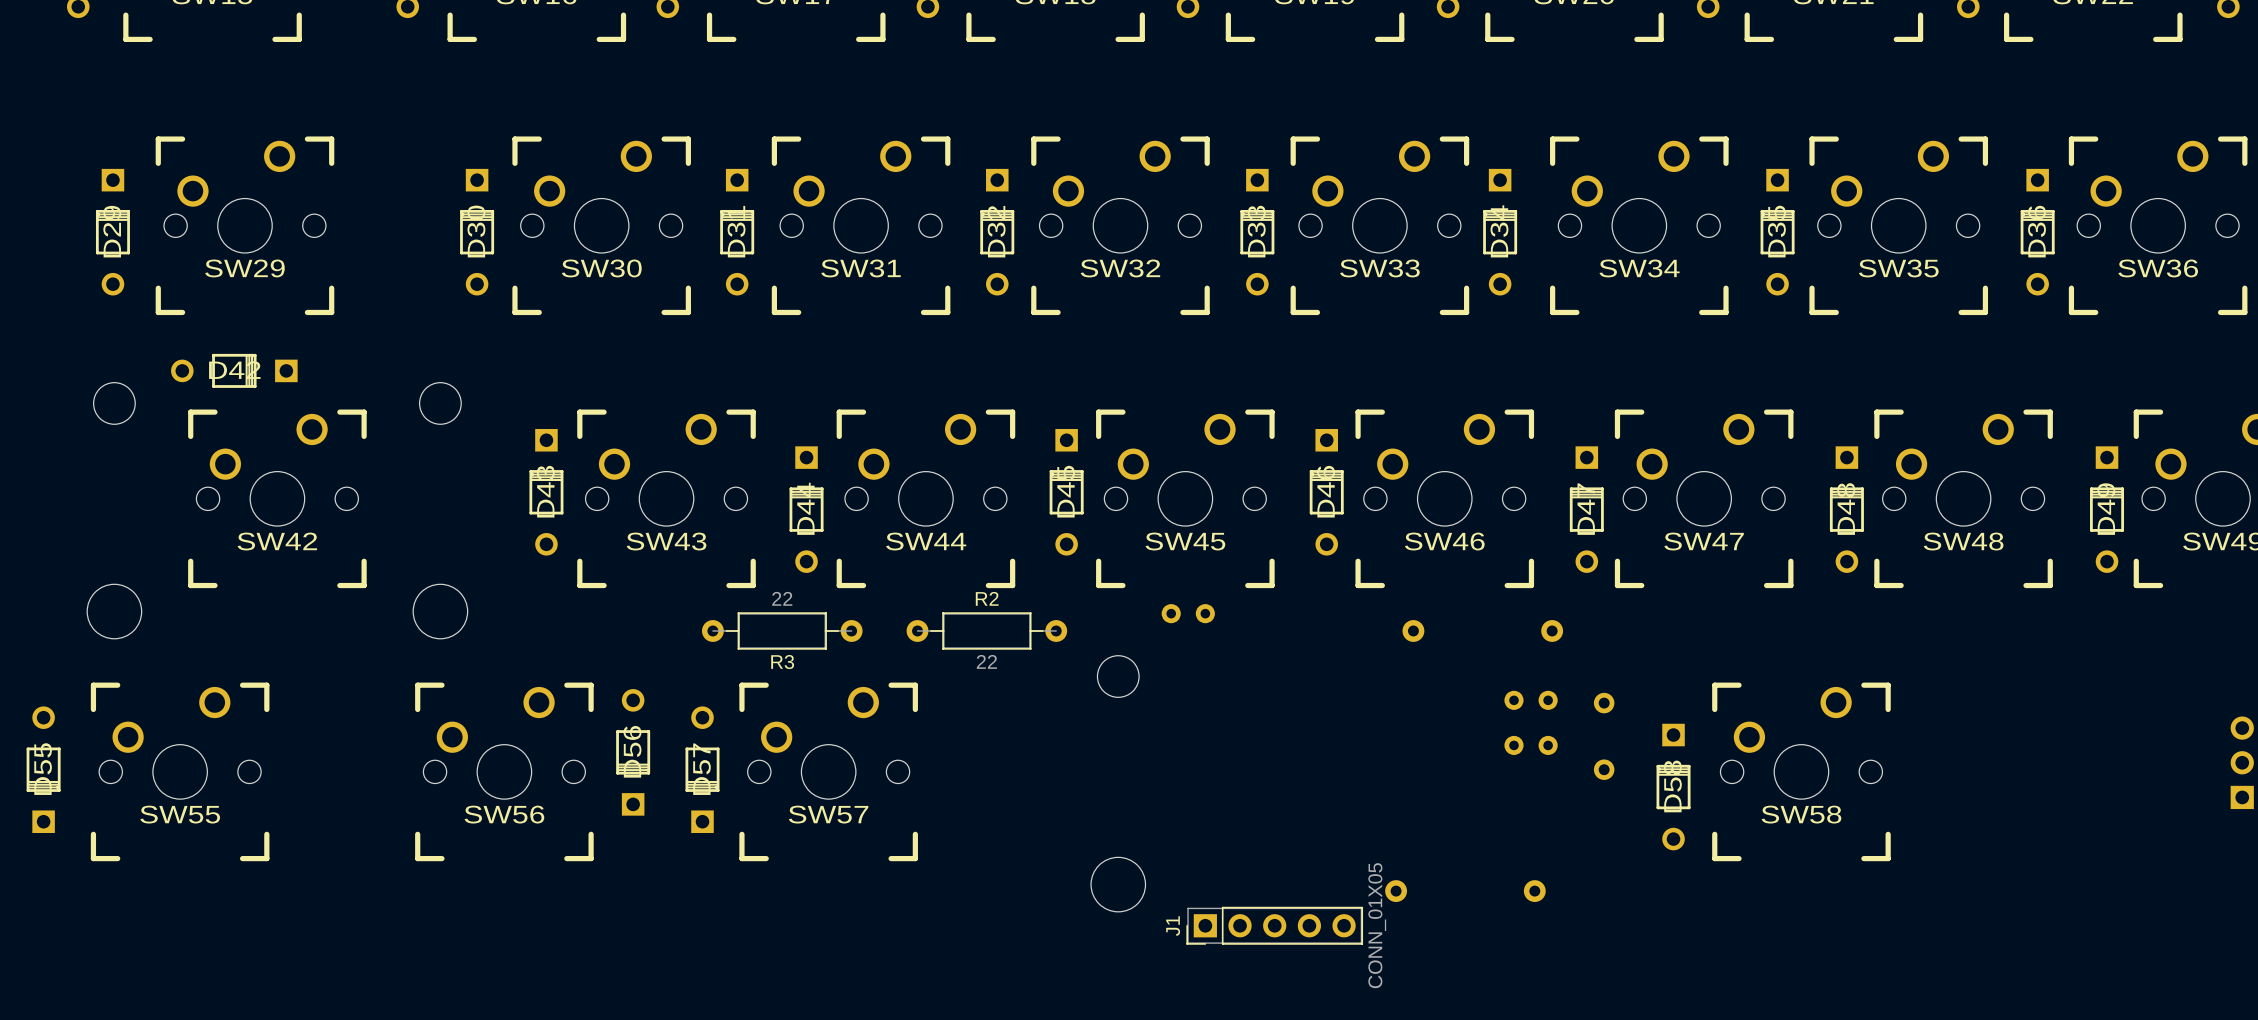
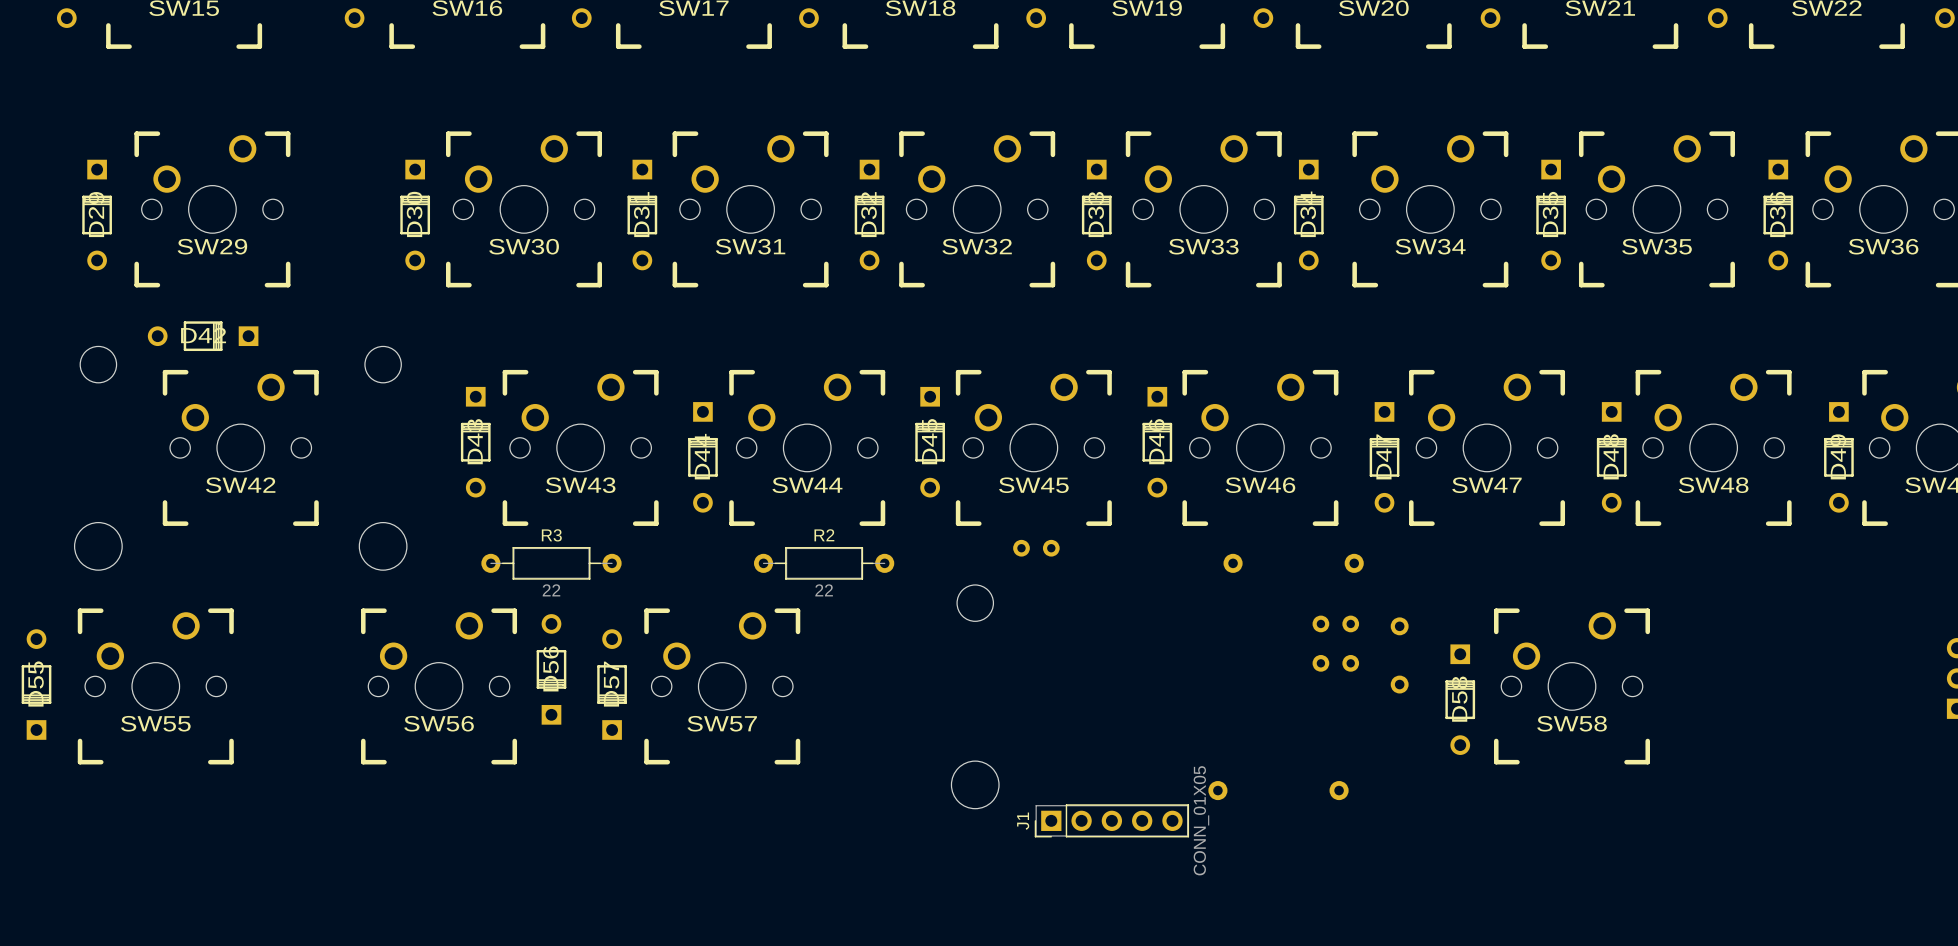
R3 value position: 22 (782, 598) -> 22 (551, 590)
R3 position: (782, 630) -> (551, 563)
R2 position: (986, 630) -> (824, 563)
R3 name position: R3 (782, 662) -> R3 (551, 535)

